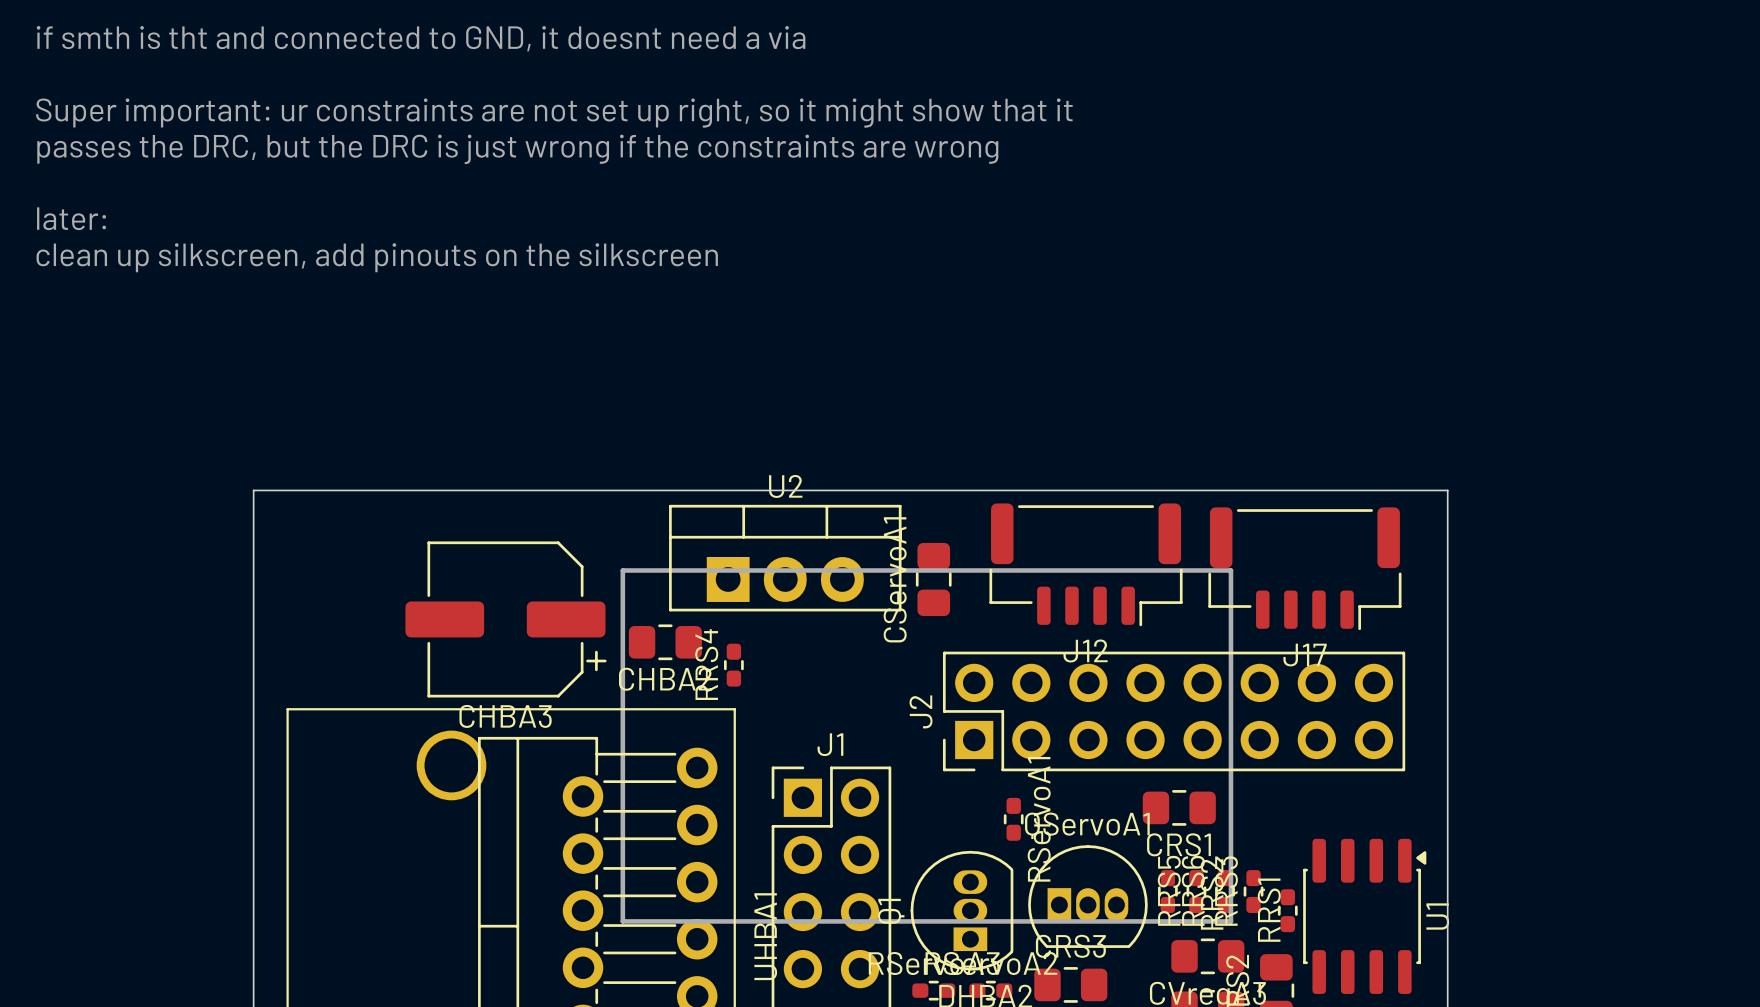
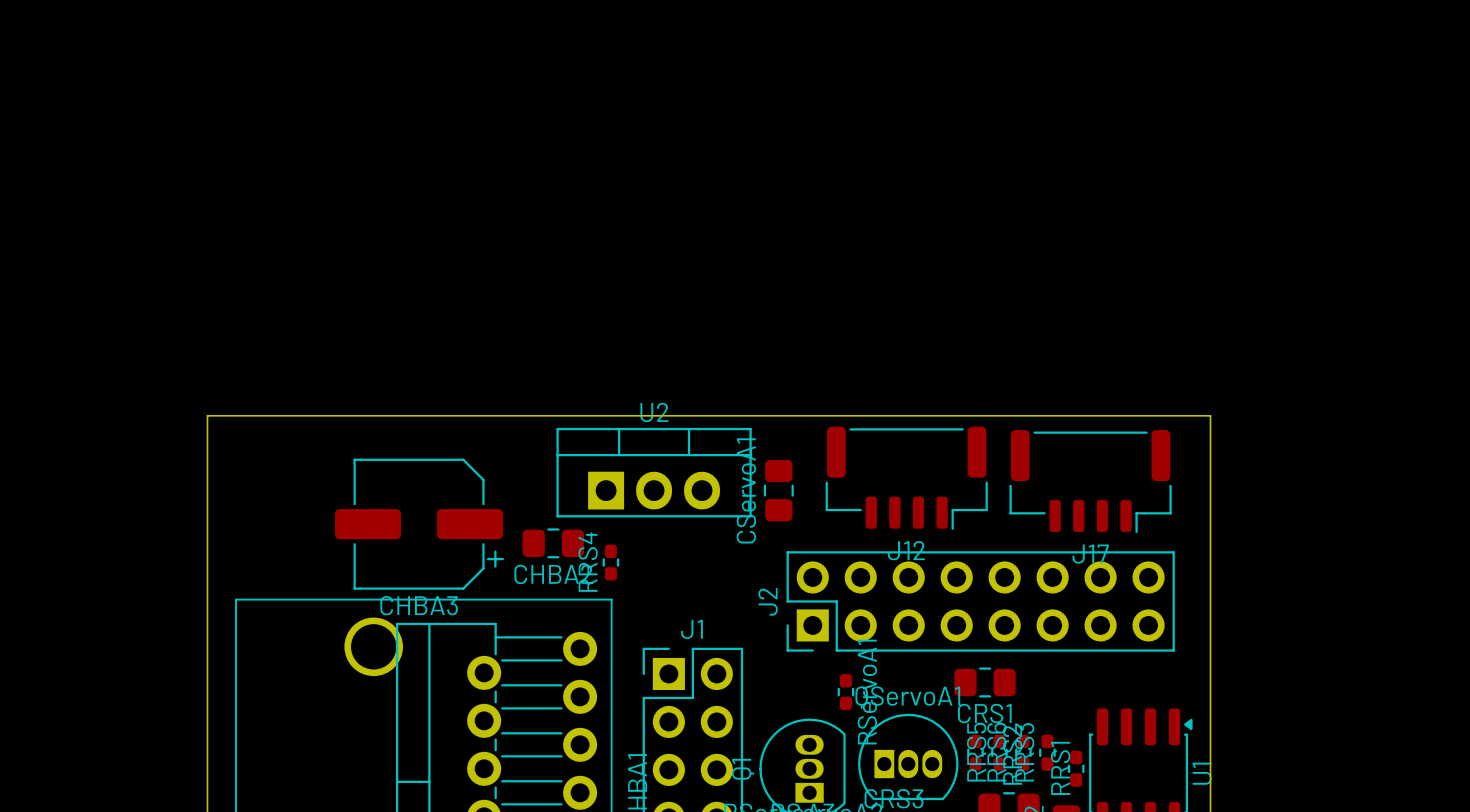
text: if smth is tht and connected to GND, it doesnt need a via (421, 38) -> none
text: Super important: ur constraints are not set up right, so it might show that it (554, 113) -> none
text: passes the DRC, but the DRC is just wrong if the constraints are wrong (517, 149) -> none
text: later: (71, 218) -> none
text: clean up silkscreen, add pinouts on the silkscreen (377, 257) -> none
line: (622, 570) (1230, 570) (1230, 921) (622, 921) (622, 570) -> none

